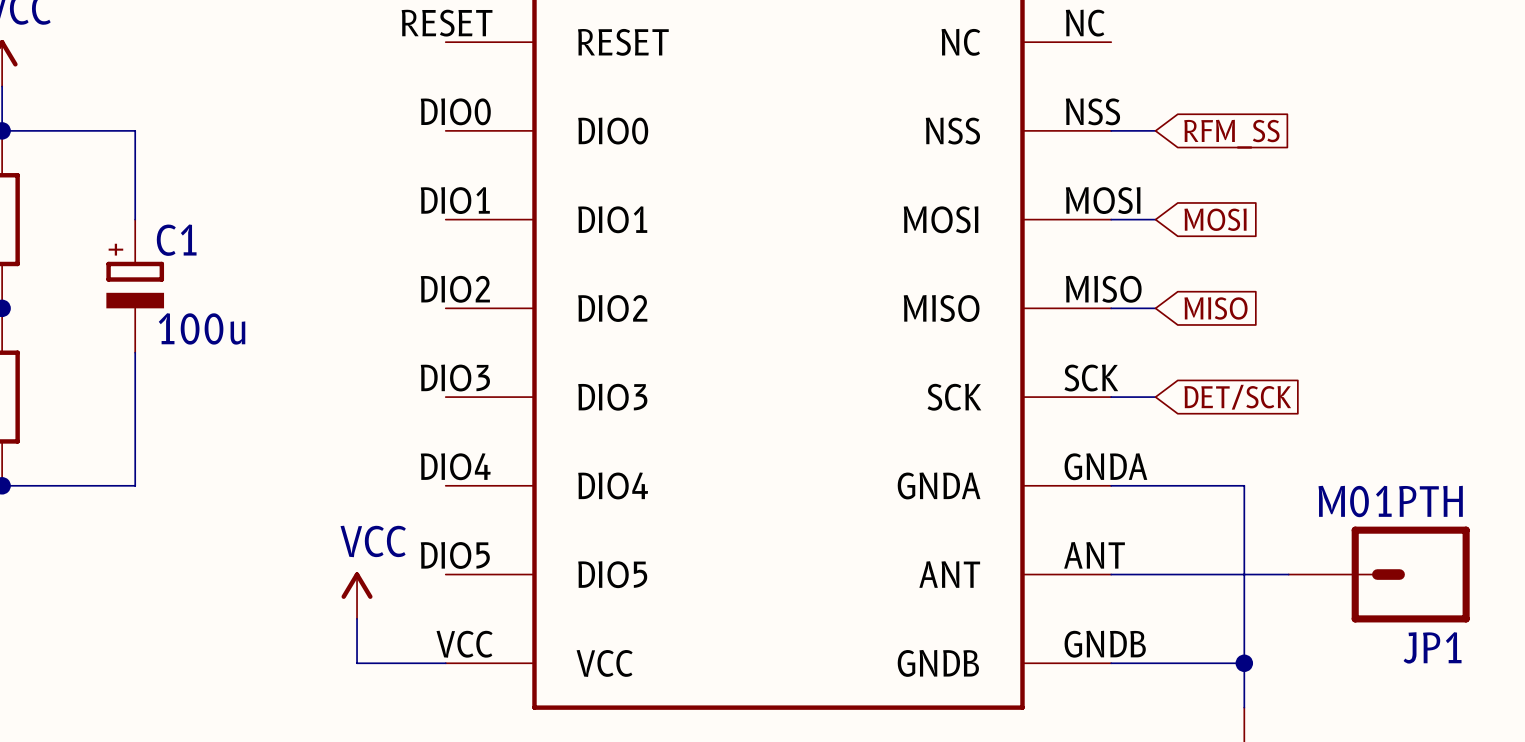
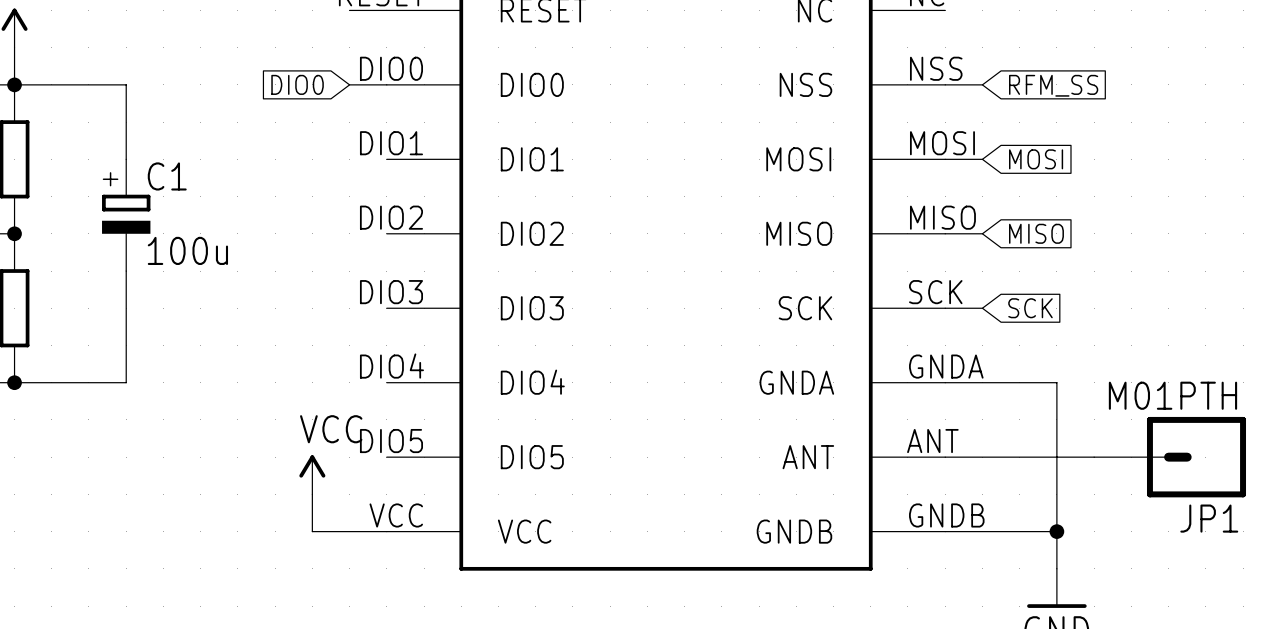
wire: none -> (349, 10) (386, 10)
wire: none -> (349, 84) (386, 84)
global label: none -> DIO0 (297, 84)
global label: DET/SCK (1237, 397) -> SCK (1030, 308)

